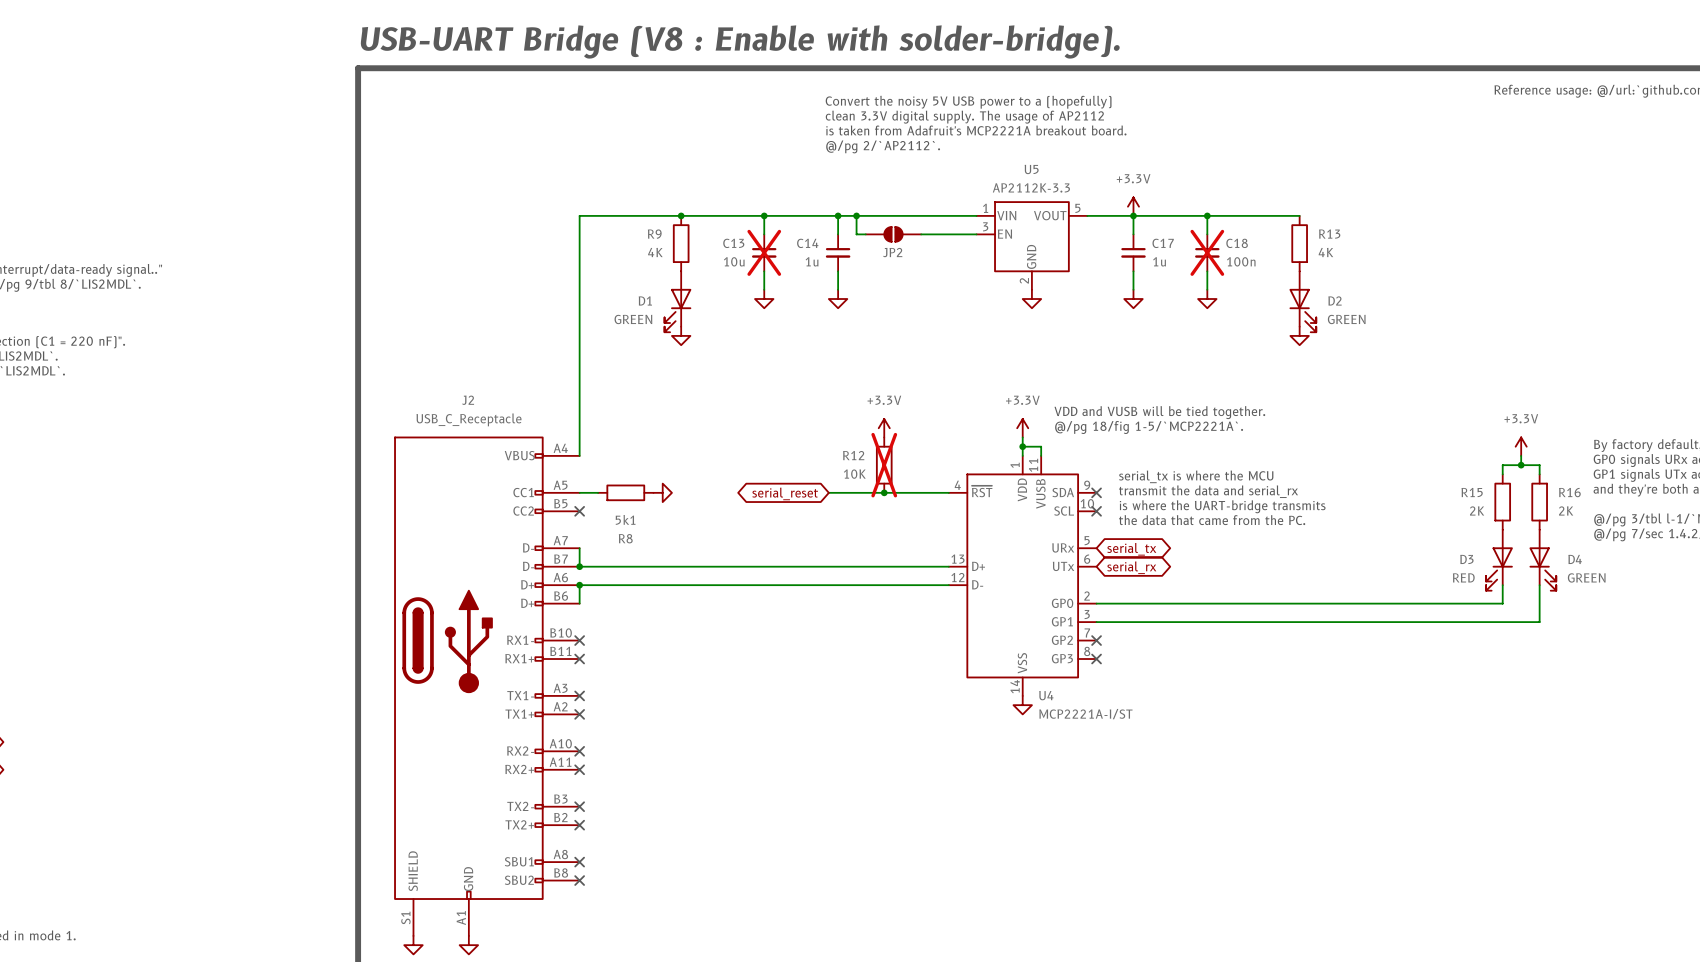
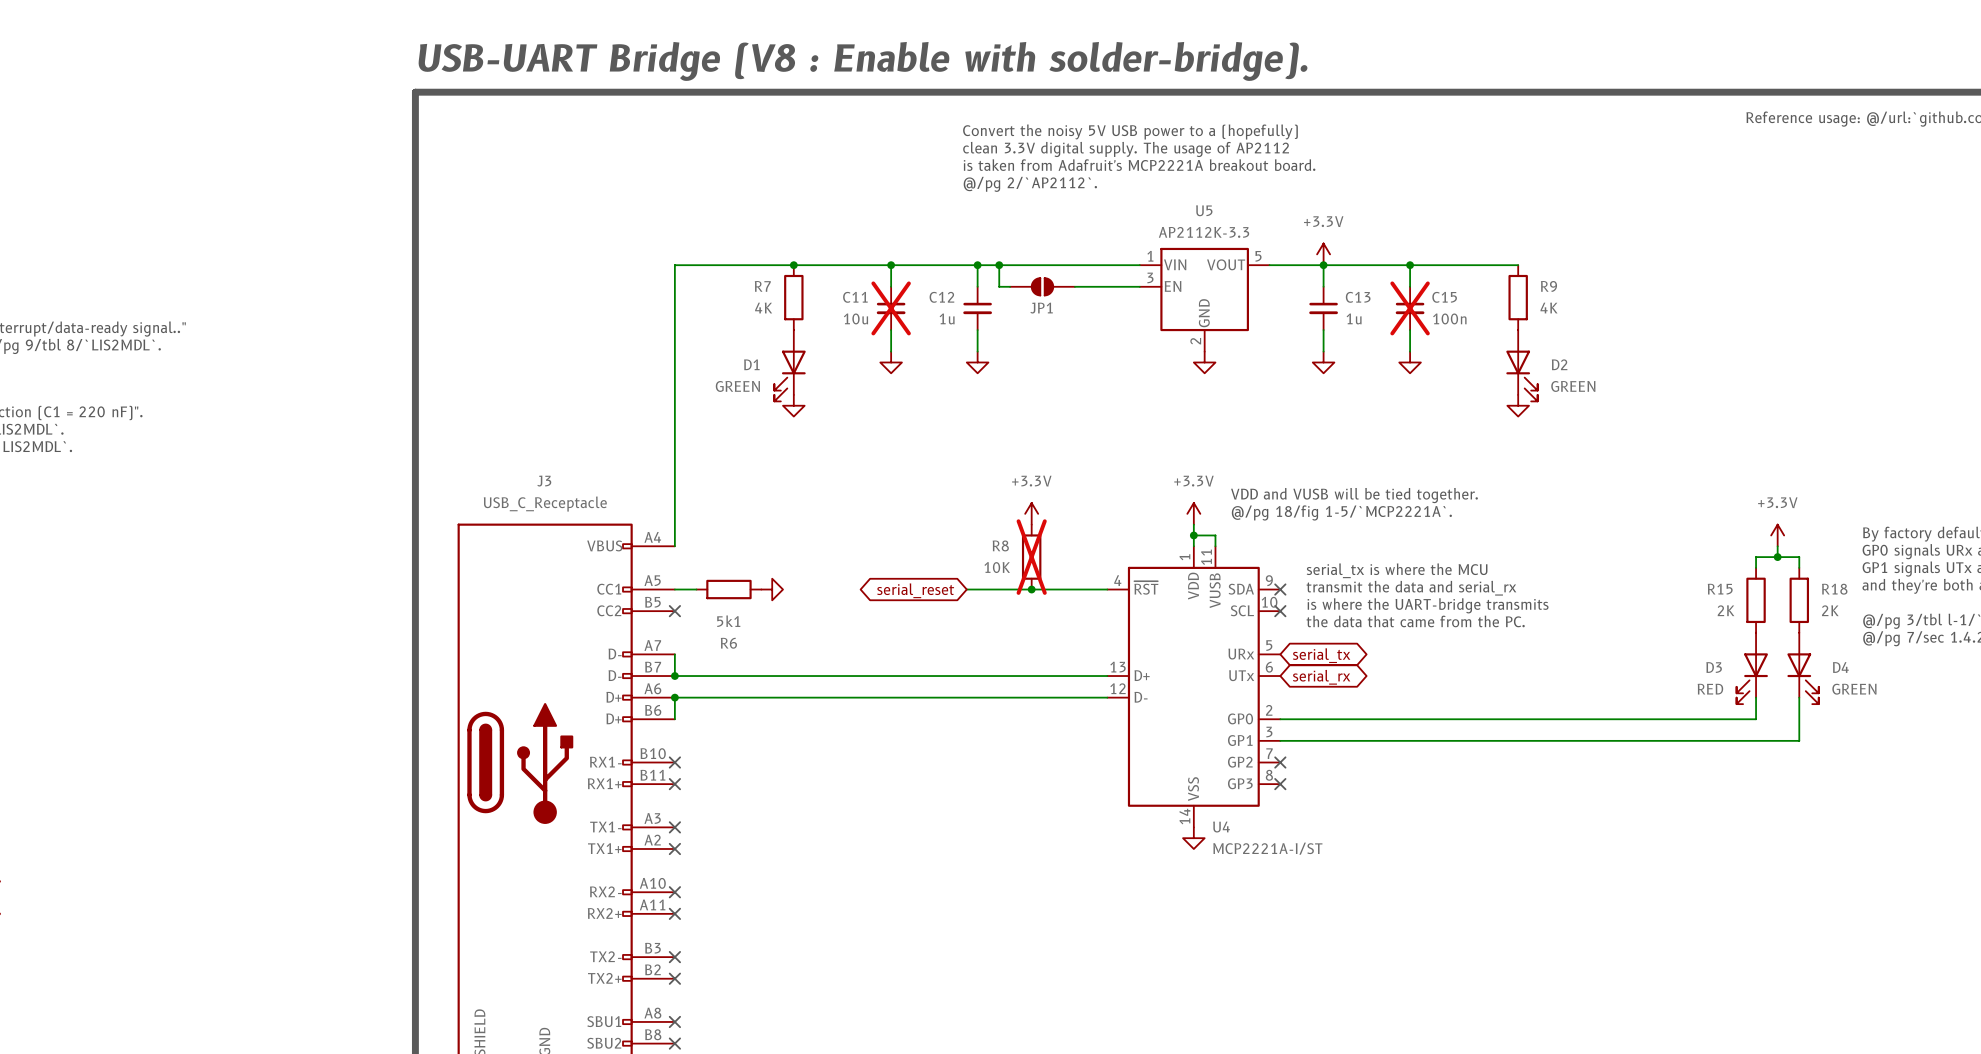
R9 name: R9 (654, 234) -> R7 (762, 286)
R13 name: R13 (1329, 234) -> R9 (1548, 286)
C13 name: C13 (733, 243) -> C11 (855, 297)
C14 name: C14 (807, 243) -> C12 (941, 297)
C17 name: C17 (1163, 243) -> C13 (1358, 297)
C18 name: C18 (1237, 243) -> C15 (1444, 297)
JP2 name: JP2 (892, 252) -> JP1 (1041, 308)
J2 name: J2 (468, 400) -> J3 (544, 481)
R12 name: R12 (853, 455) -> R8 (1000, 545)
R16 name: R16 (1569, 492) -> R18 (1834, 589)
R8 name: R8 (625, 538) -> R6 (728, 643)

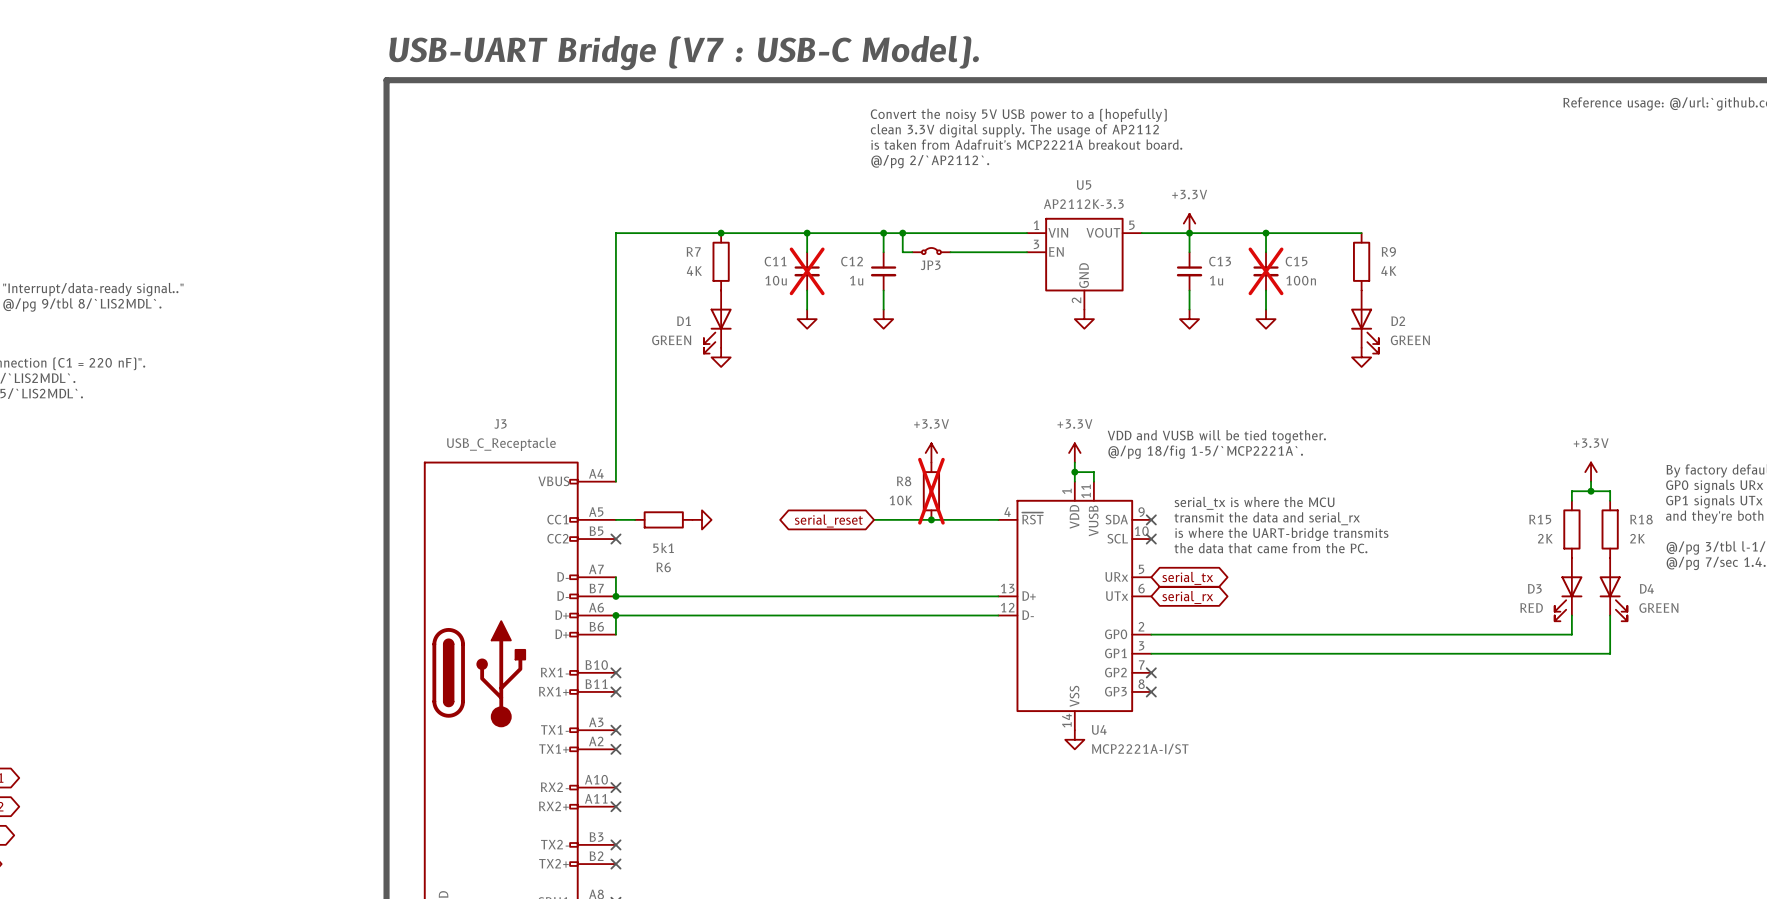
text: USB-UART Bridge (V8 : Enable with solder-bridge). (862, 61) -> USB-UART Bridge (V7 : USB-C Model). (684, 52)
JP3: none -> (931, 251)
JP1: (1042, 286) -> none

